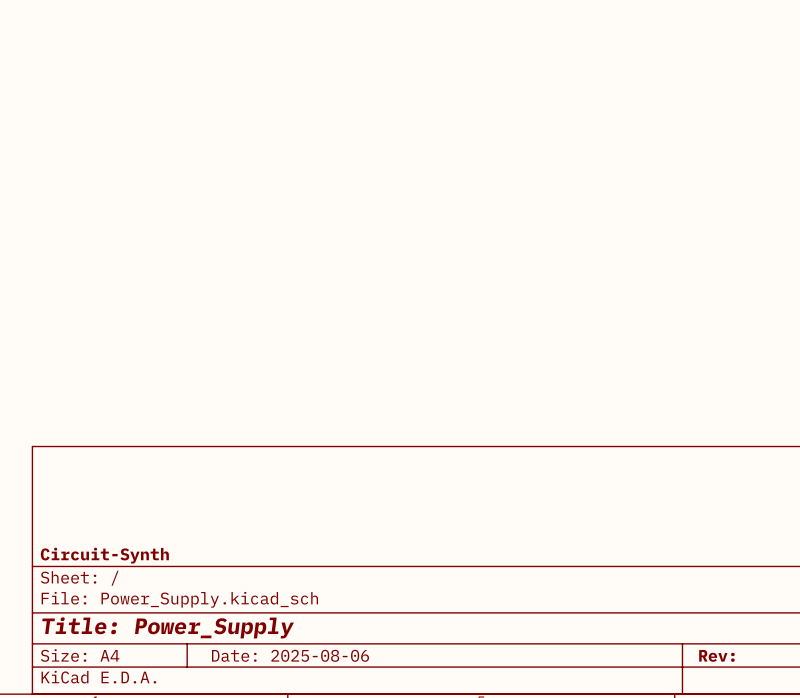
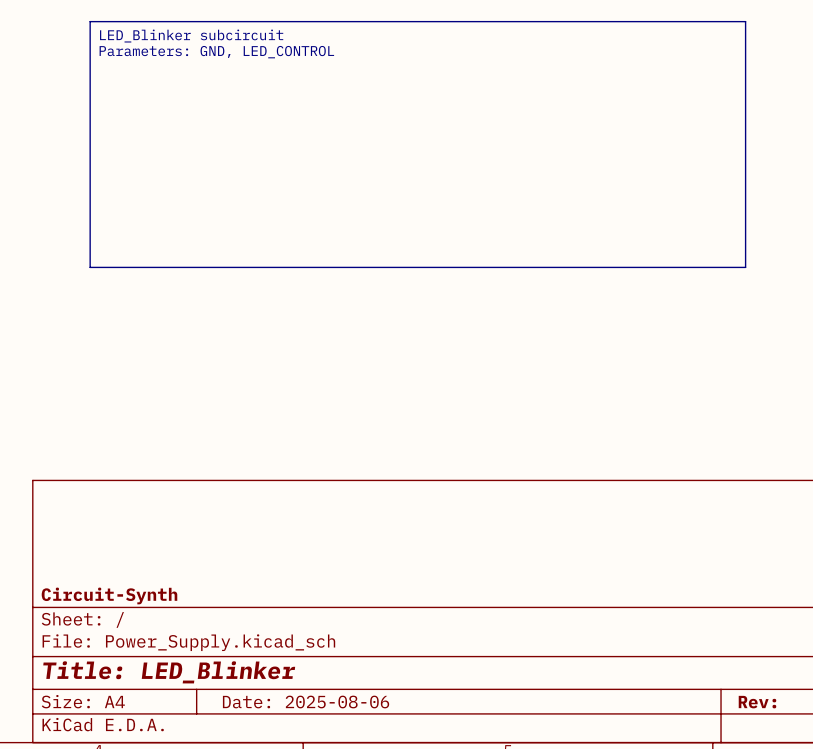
line: none -> (90, 21) (745, 21) (745, 267) (90, 267) (90, 21)
text: none -> LED_Blinker subcircuit (191, 36)
text: none -> Parameters: GND, LED_CONTROL (216, 52)
title block: Title: Power_Supply (168, 627) -> Title: LED_Blinker (169, 672)

